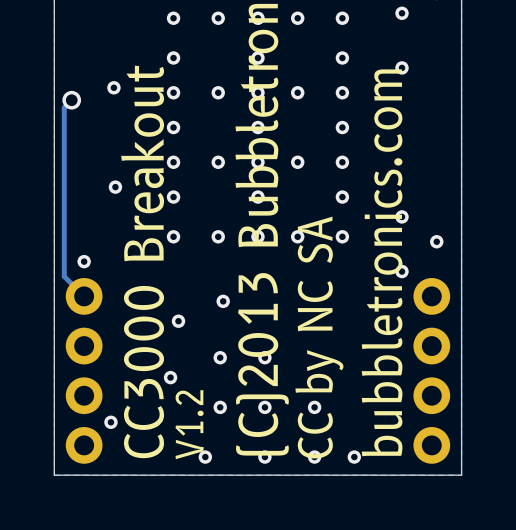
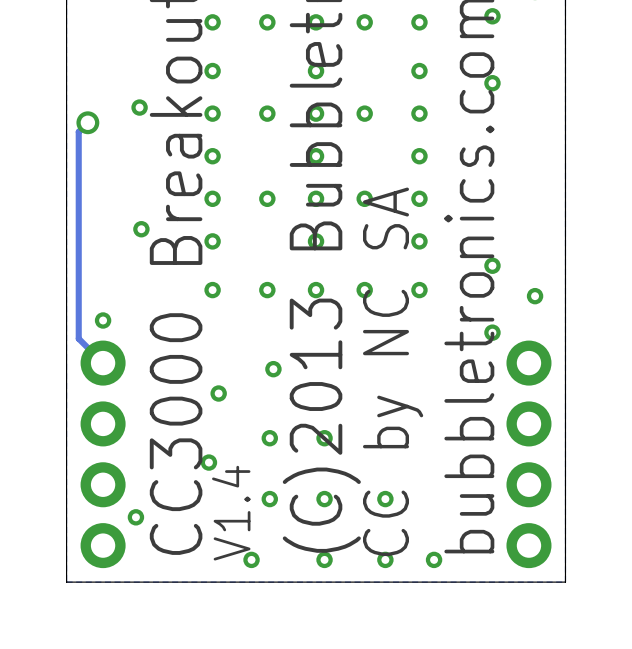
text: V1.2 (189, 424) -> V1.4 (231, 513)

